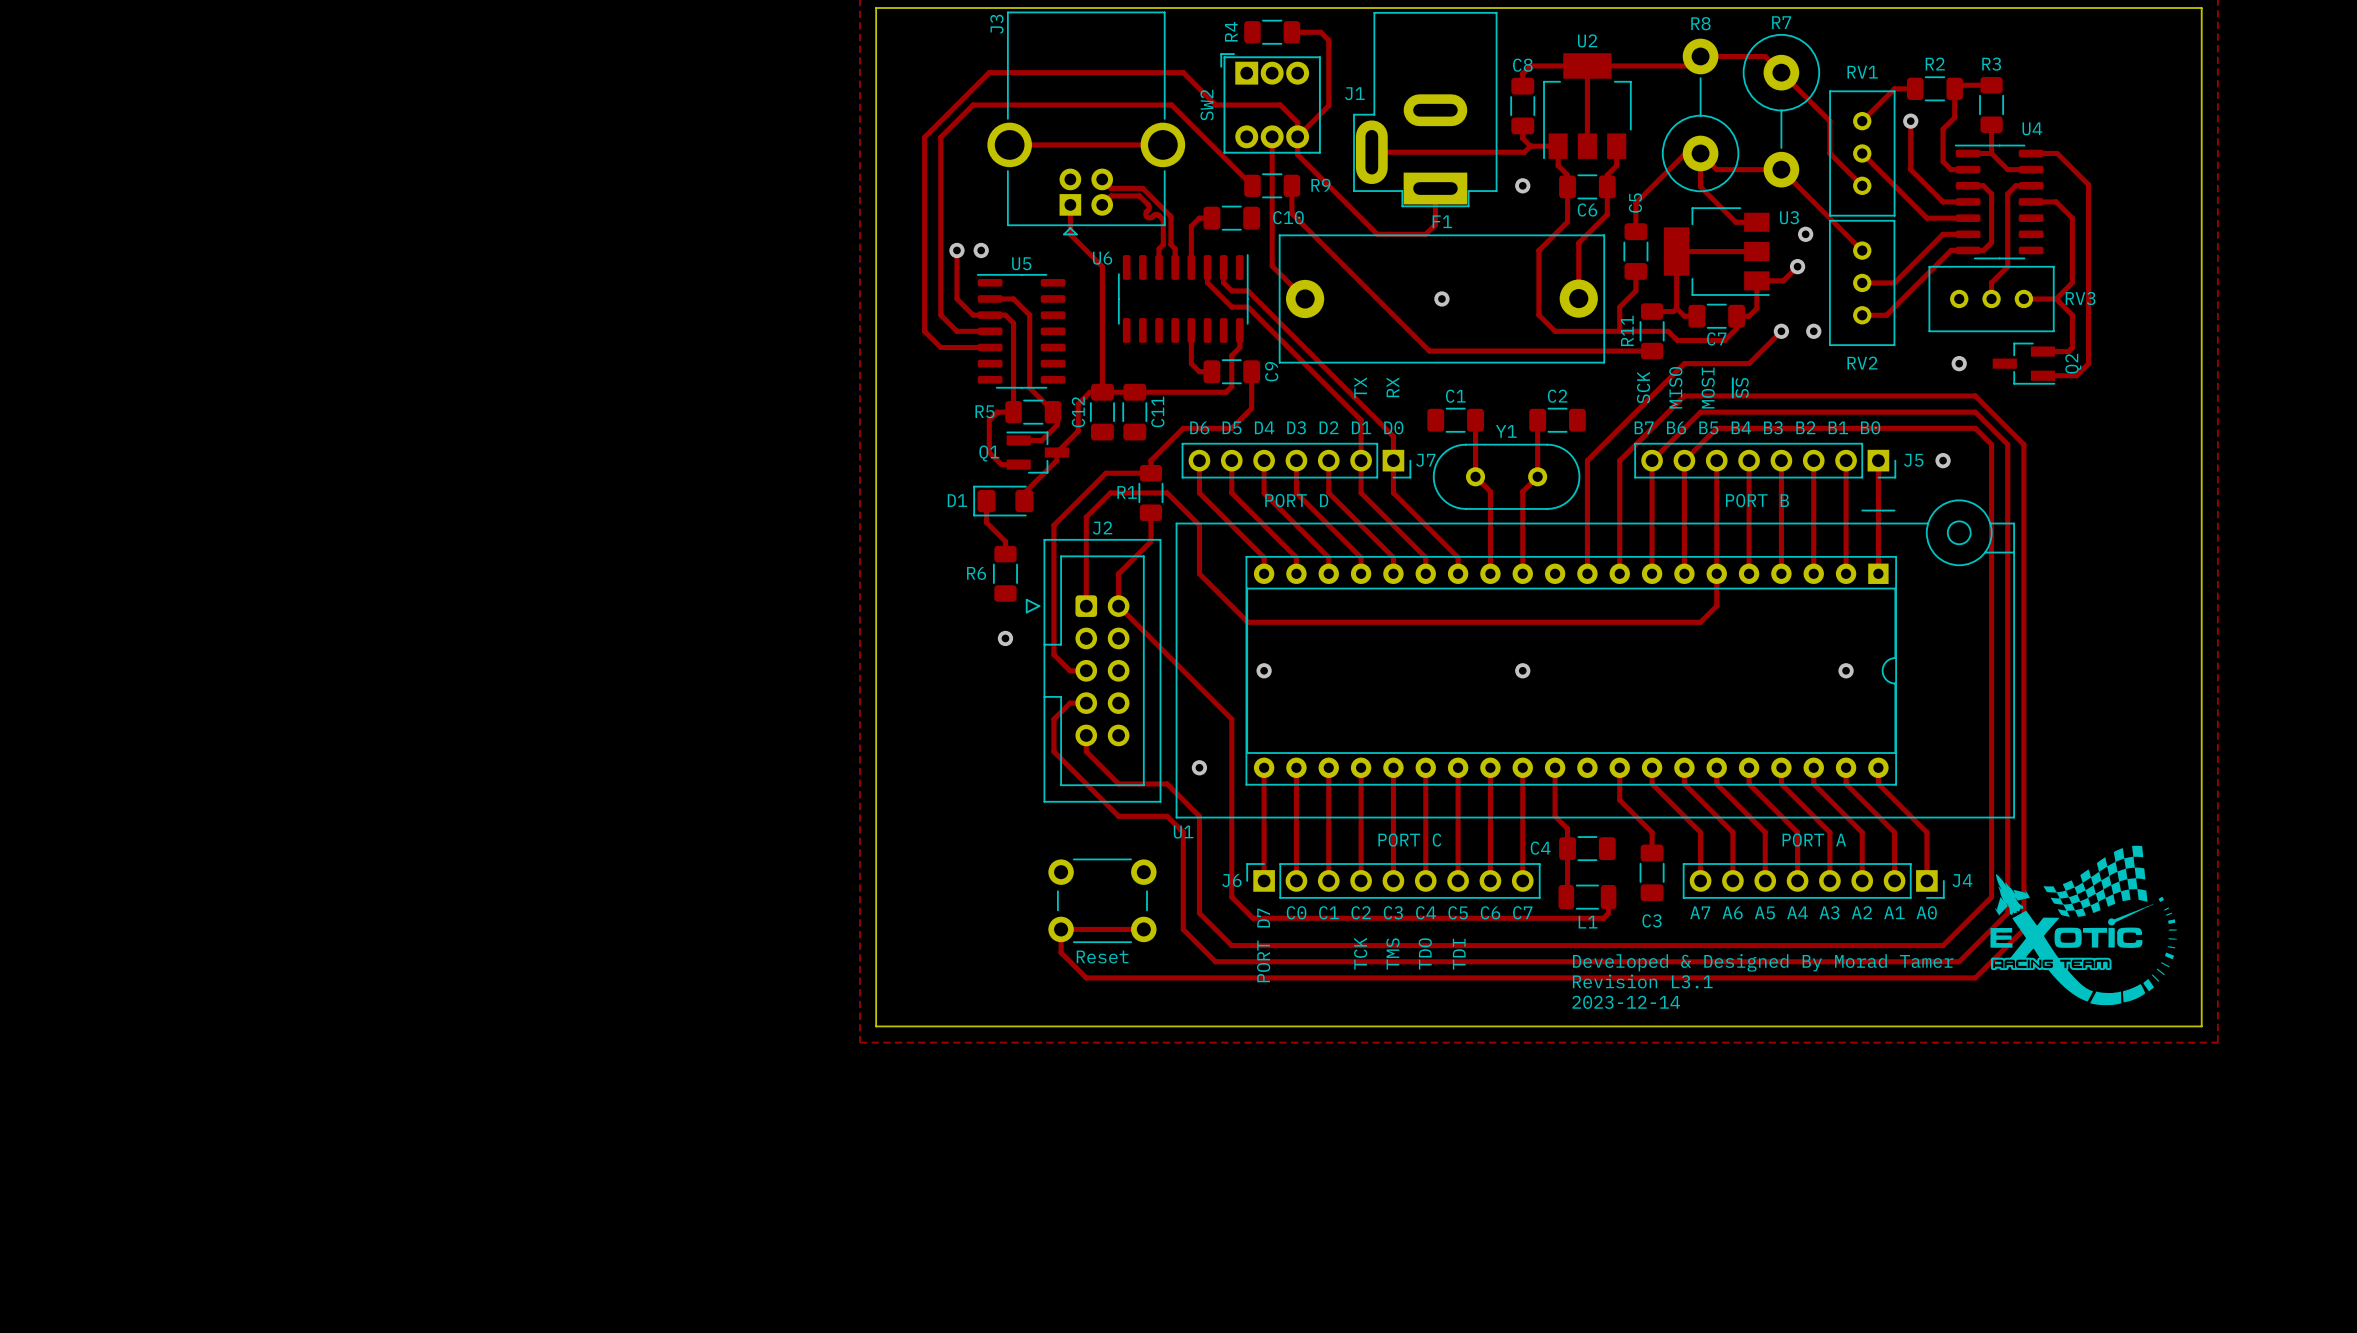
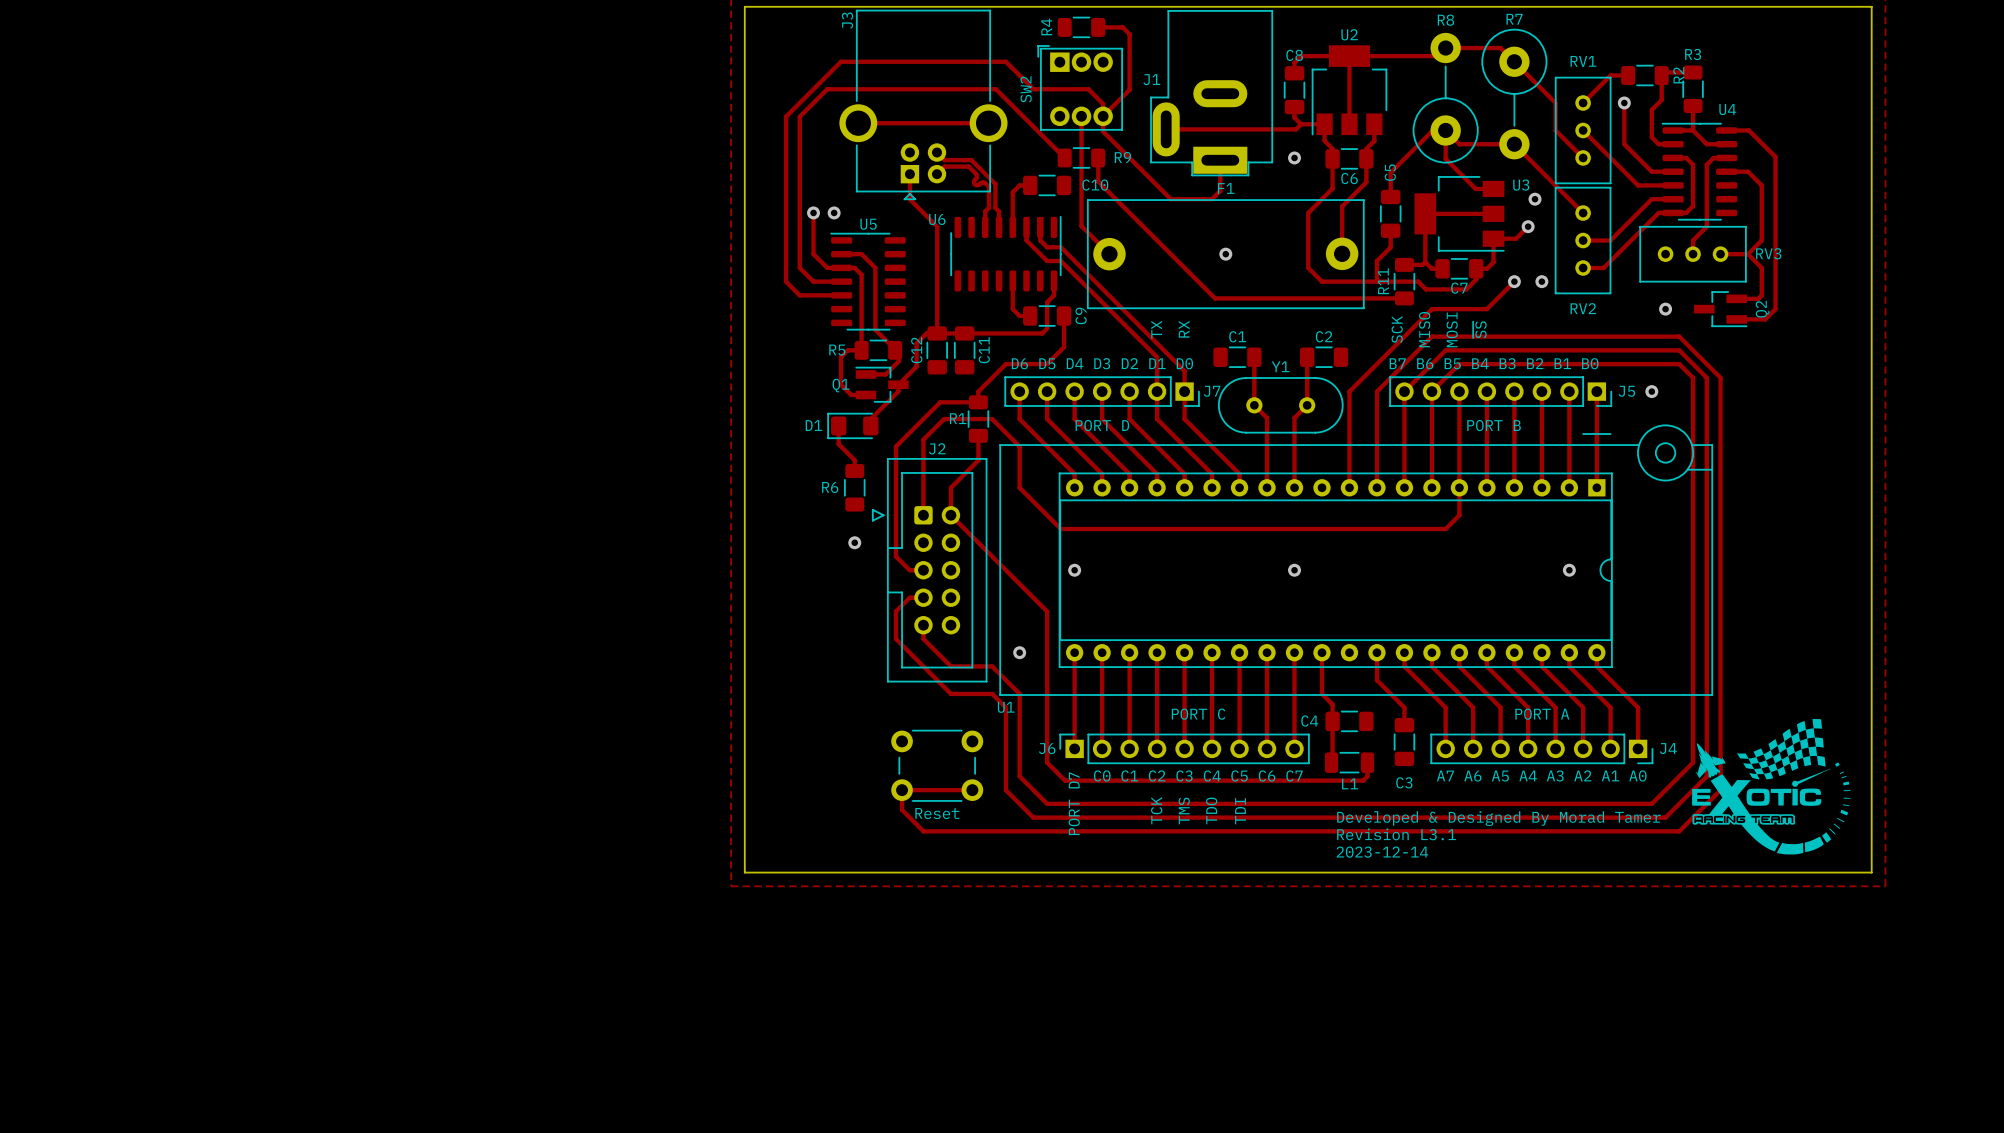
R2 name rotation: 0° (1935, 63) -> 90° counterclockwise (1678, 75)
R2 name position: R2 (1935, 63) -> R2 (1678, 75)

